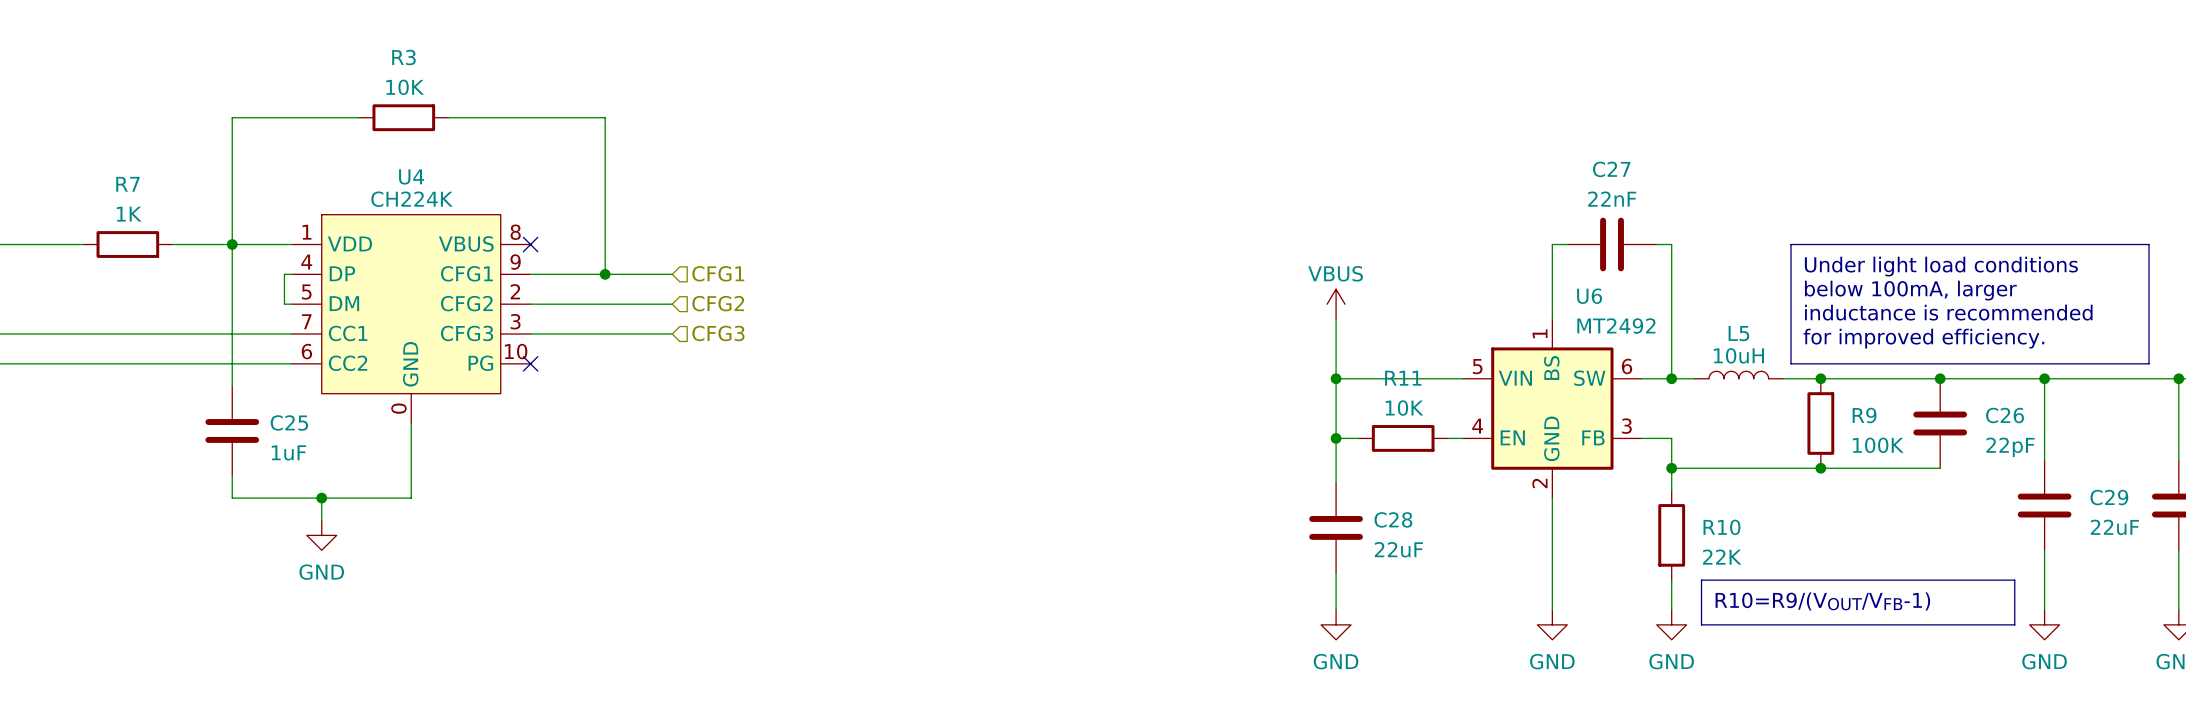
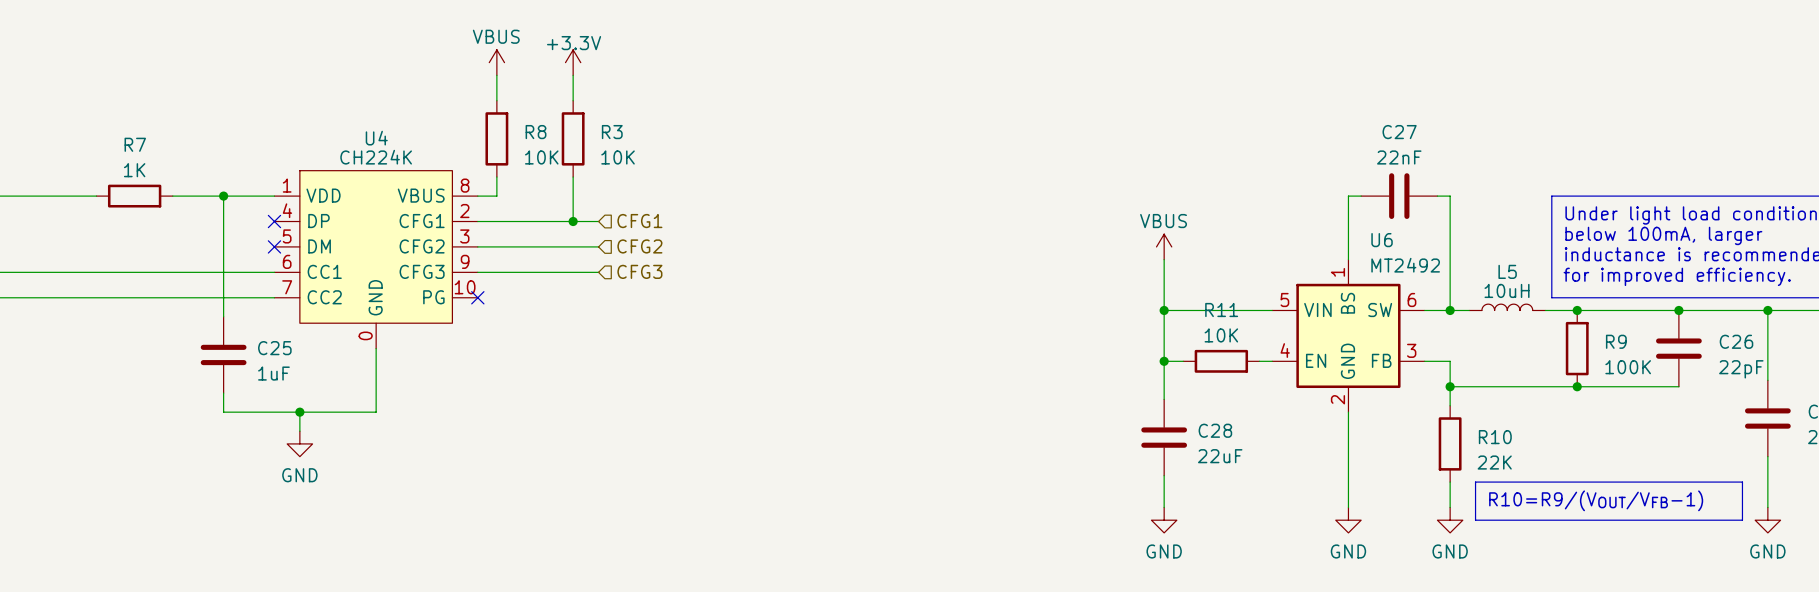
R3 value position: 10K (405, 87) -> 10K (618, 157)
power symbol: none -> VBUS (496, 62)
power symbol: none -> +3.3V (573, 62)
wire: none -> (496, 75) (496, 100)
wire: none -> (573, 75) (573, 100)
wire: (359, 117) (232, 117) (232, 244) -> none
R3 rotation: 0° (403, 117) -> 90° clockwise (573, 138)
R3 position: (403, 117) -> (573, 138)
wire: (448, 117) (605, 117) (605, 274) -> none
R8: none -> 10K (496, 138)
wire: none -> (496, 177) (496, 196) (477, 196)
wire: none -> (573, 177) (573, 221)
no-connect mark: (530, 244) -> none
U4 pin number: 9 (515, 262) -> 2 (464, 211)
wire: (291, 274) (284, 274) (284, 304) (291, 304) -> none
no-connect mark: none -> (274, 221)
junction position: (605, 274) -> (573, 221)
U4 pin number: 2 (515, 291) -> 3 (464, 236)
no-connect mark: none -> (274, 246)
U4 pin number: 7 (306, 321) -> 6 (287, 261)
U4 pin number: 3 (515, 321) -> 9 (465, 261)
U4 pin number: 6 (306, 351) -> 7 (287, 287)

